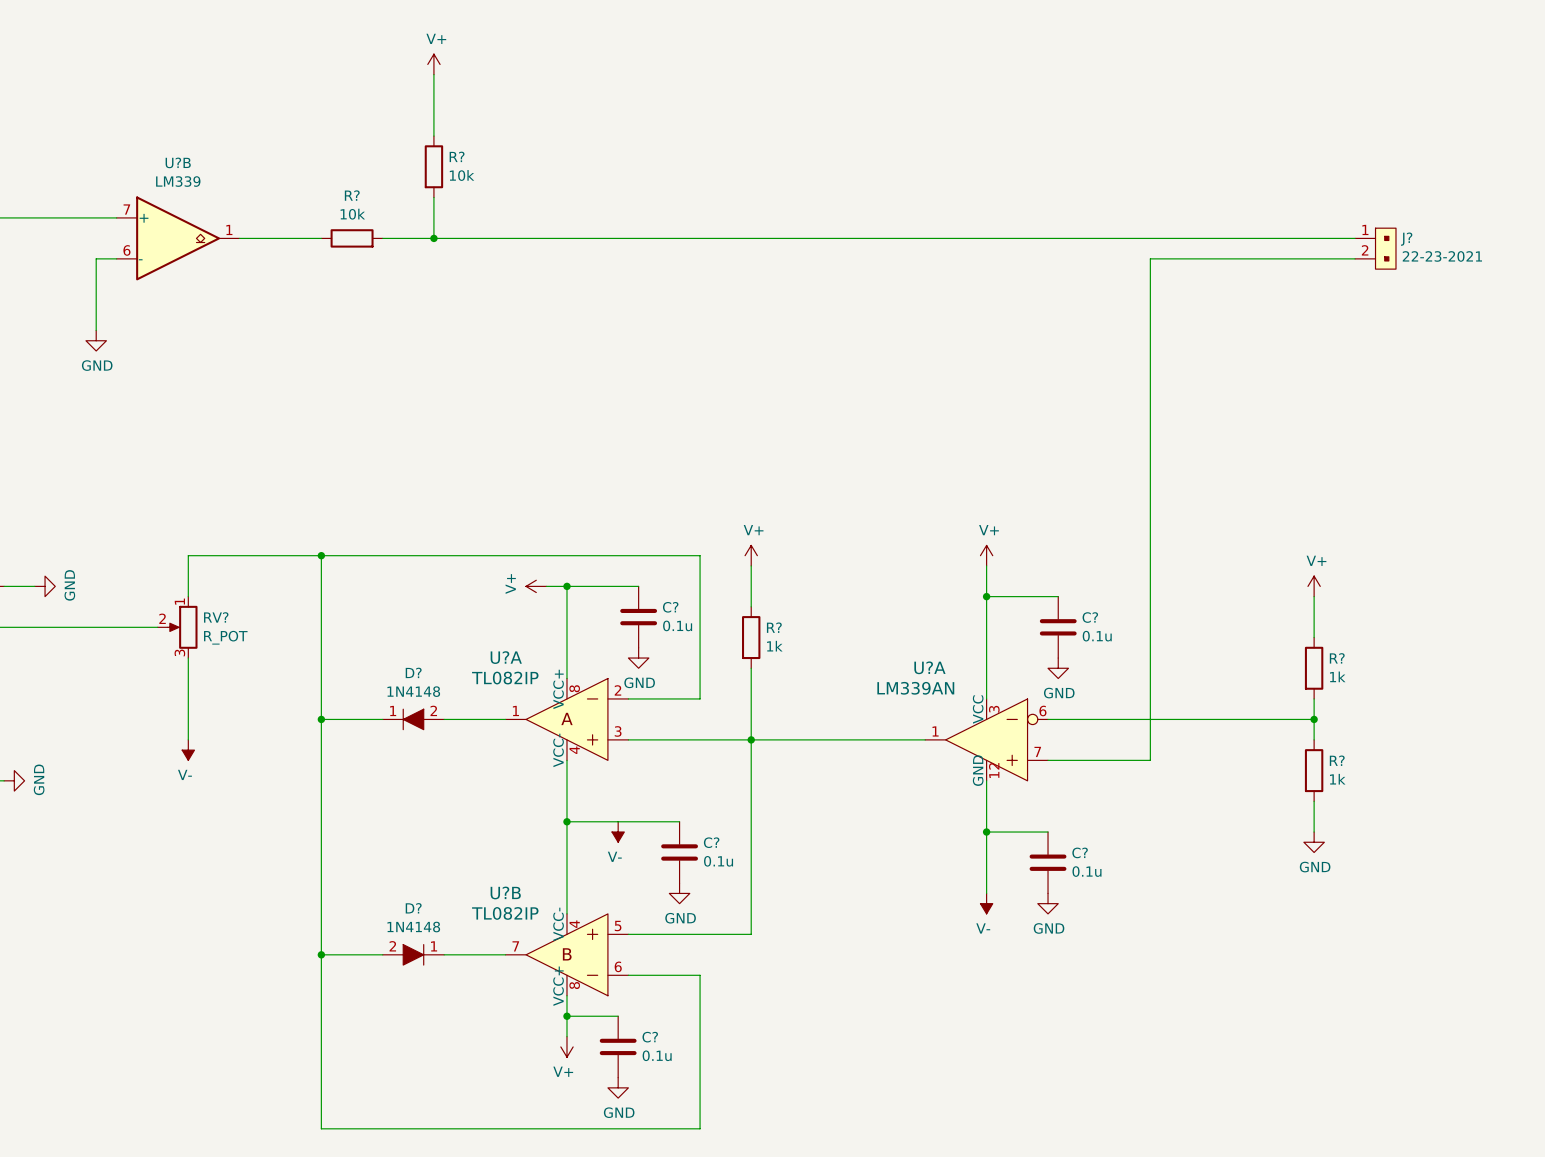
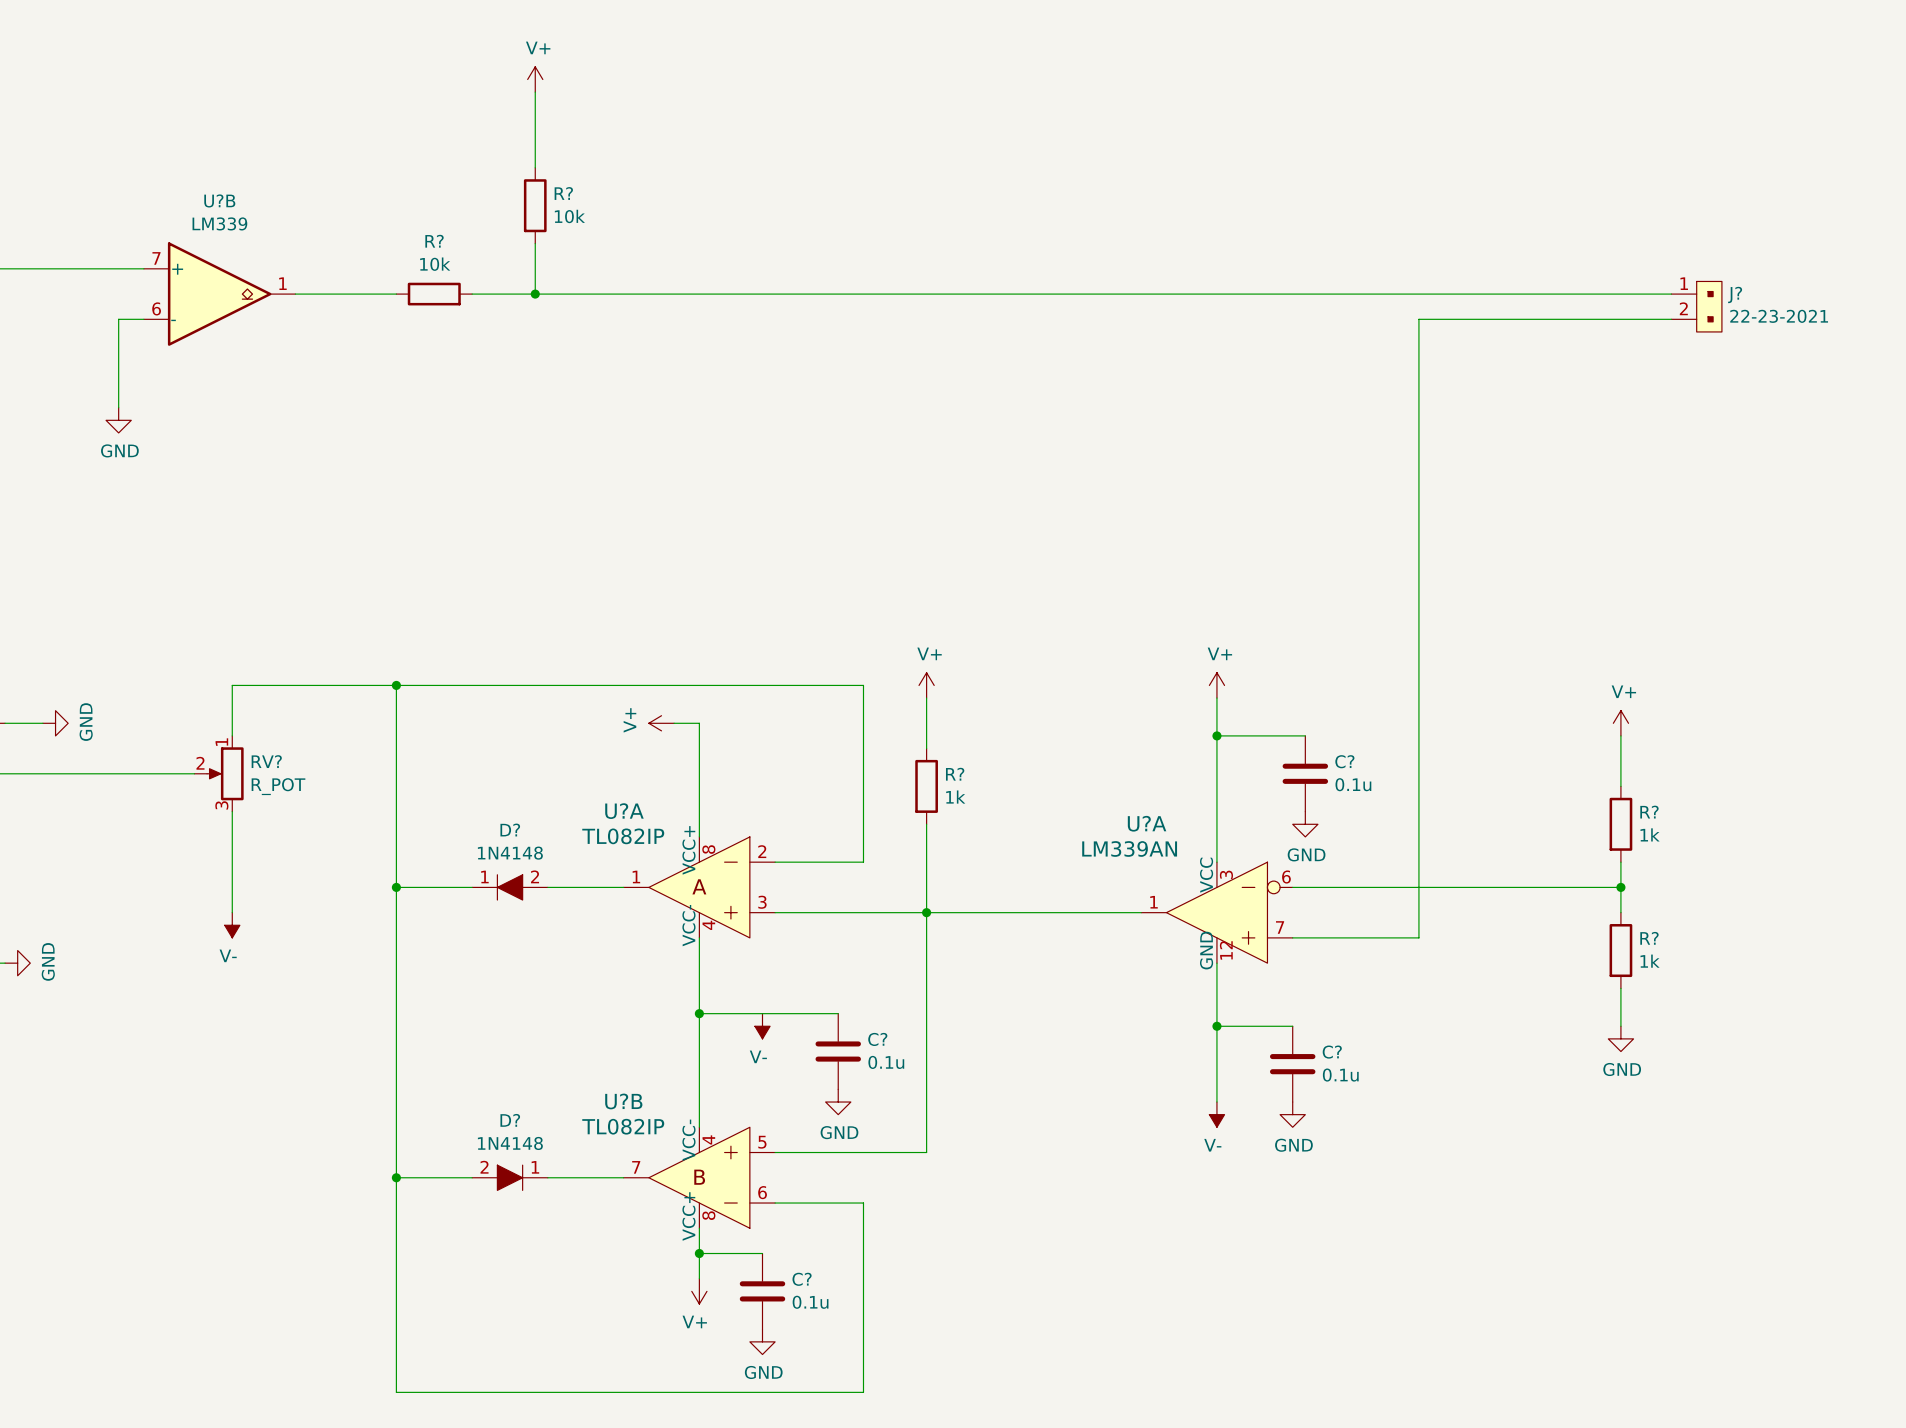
wire: (566, 586) (638, 586) -> none
junction: (566, 586) -> none
C?: 0.1u (638, 617) -> none
power symbol: GND (638, 658) -> none

